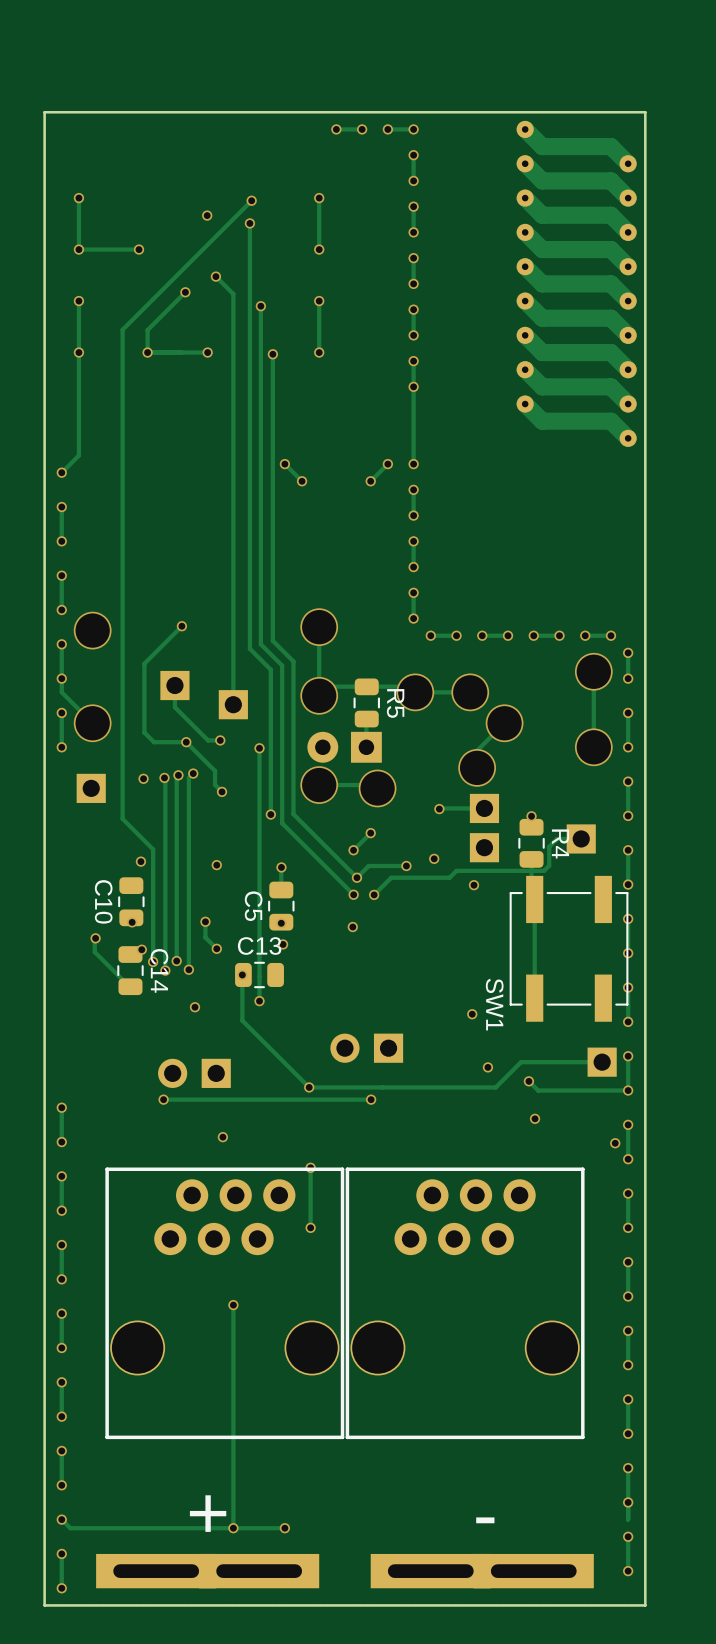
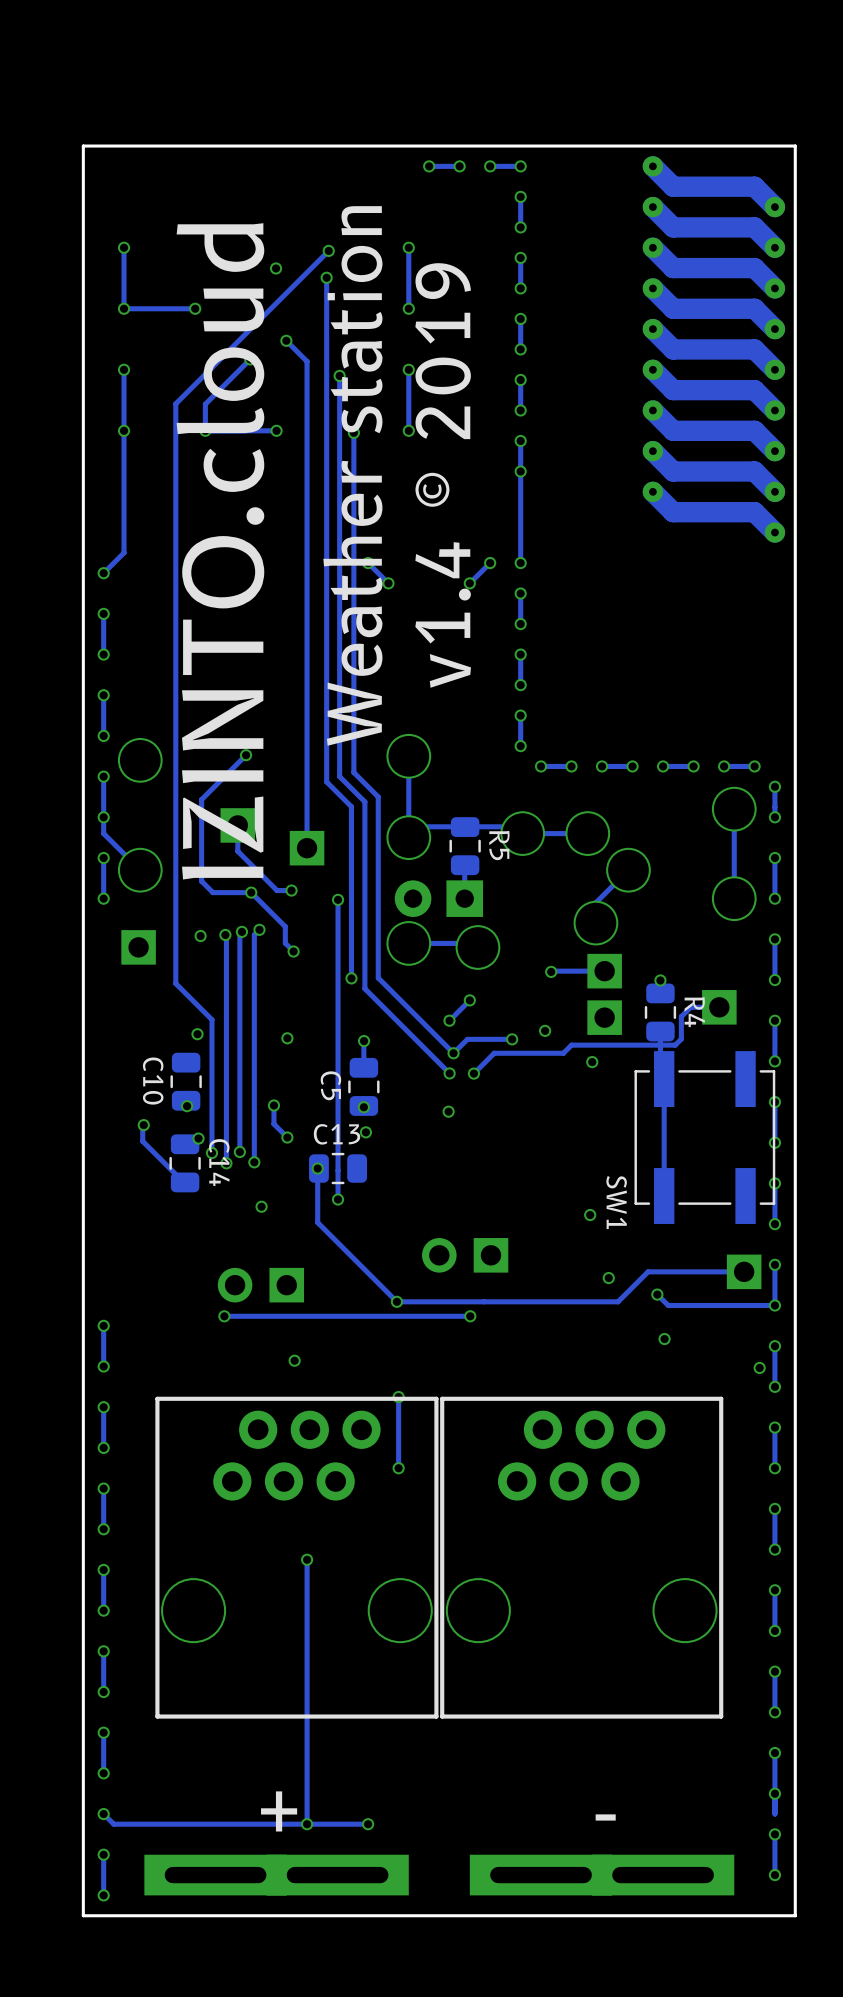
text: none -> Weather station (352, 475)
text: none -> v1.4 © 2019 (443, 475)
text: none -> IZINTO.cloud (220, 551)

